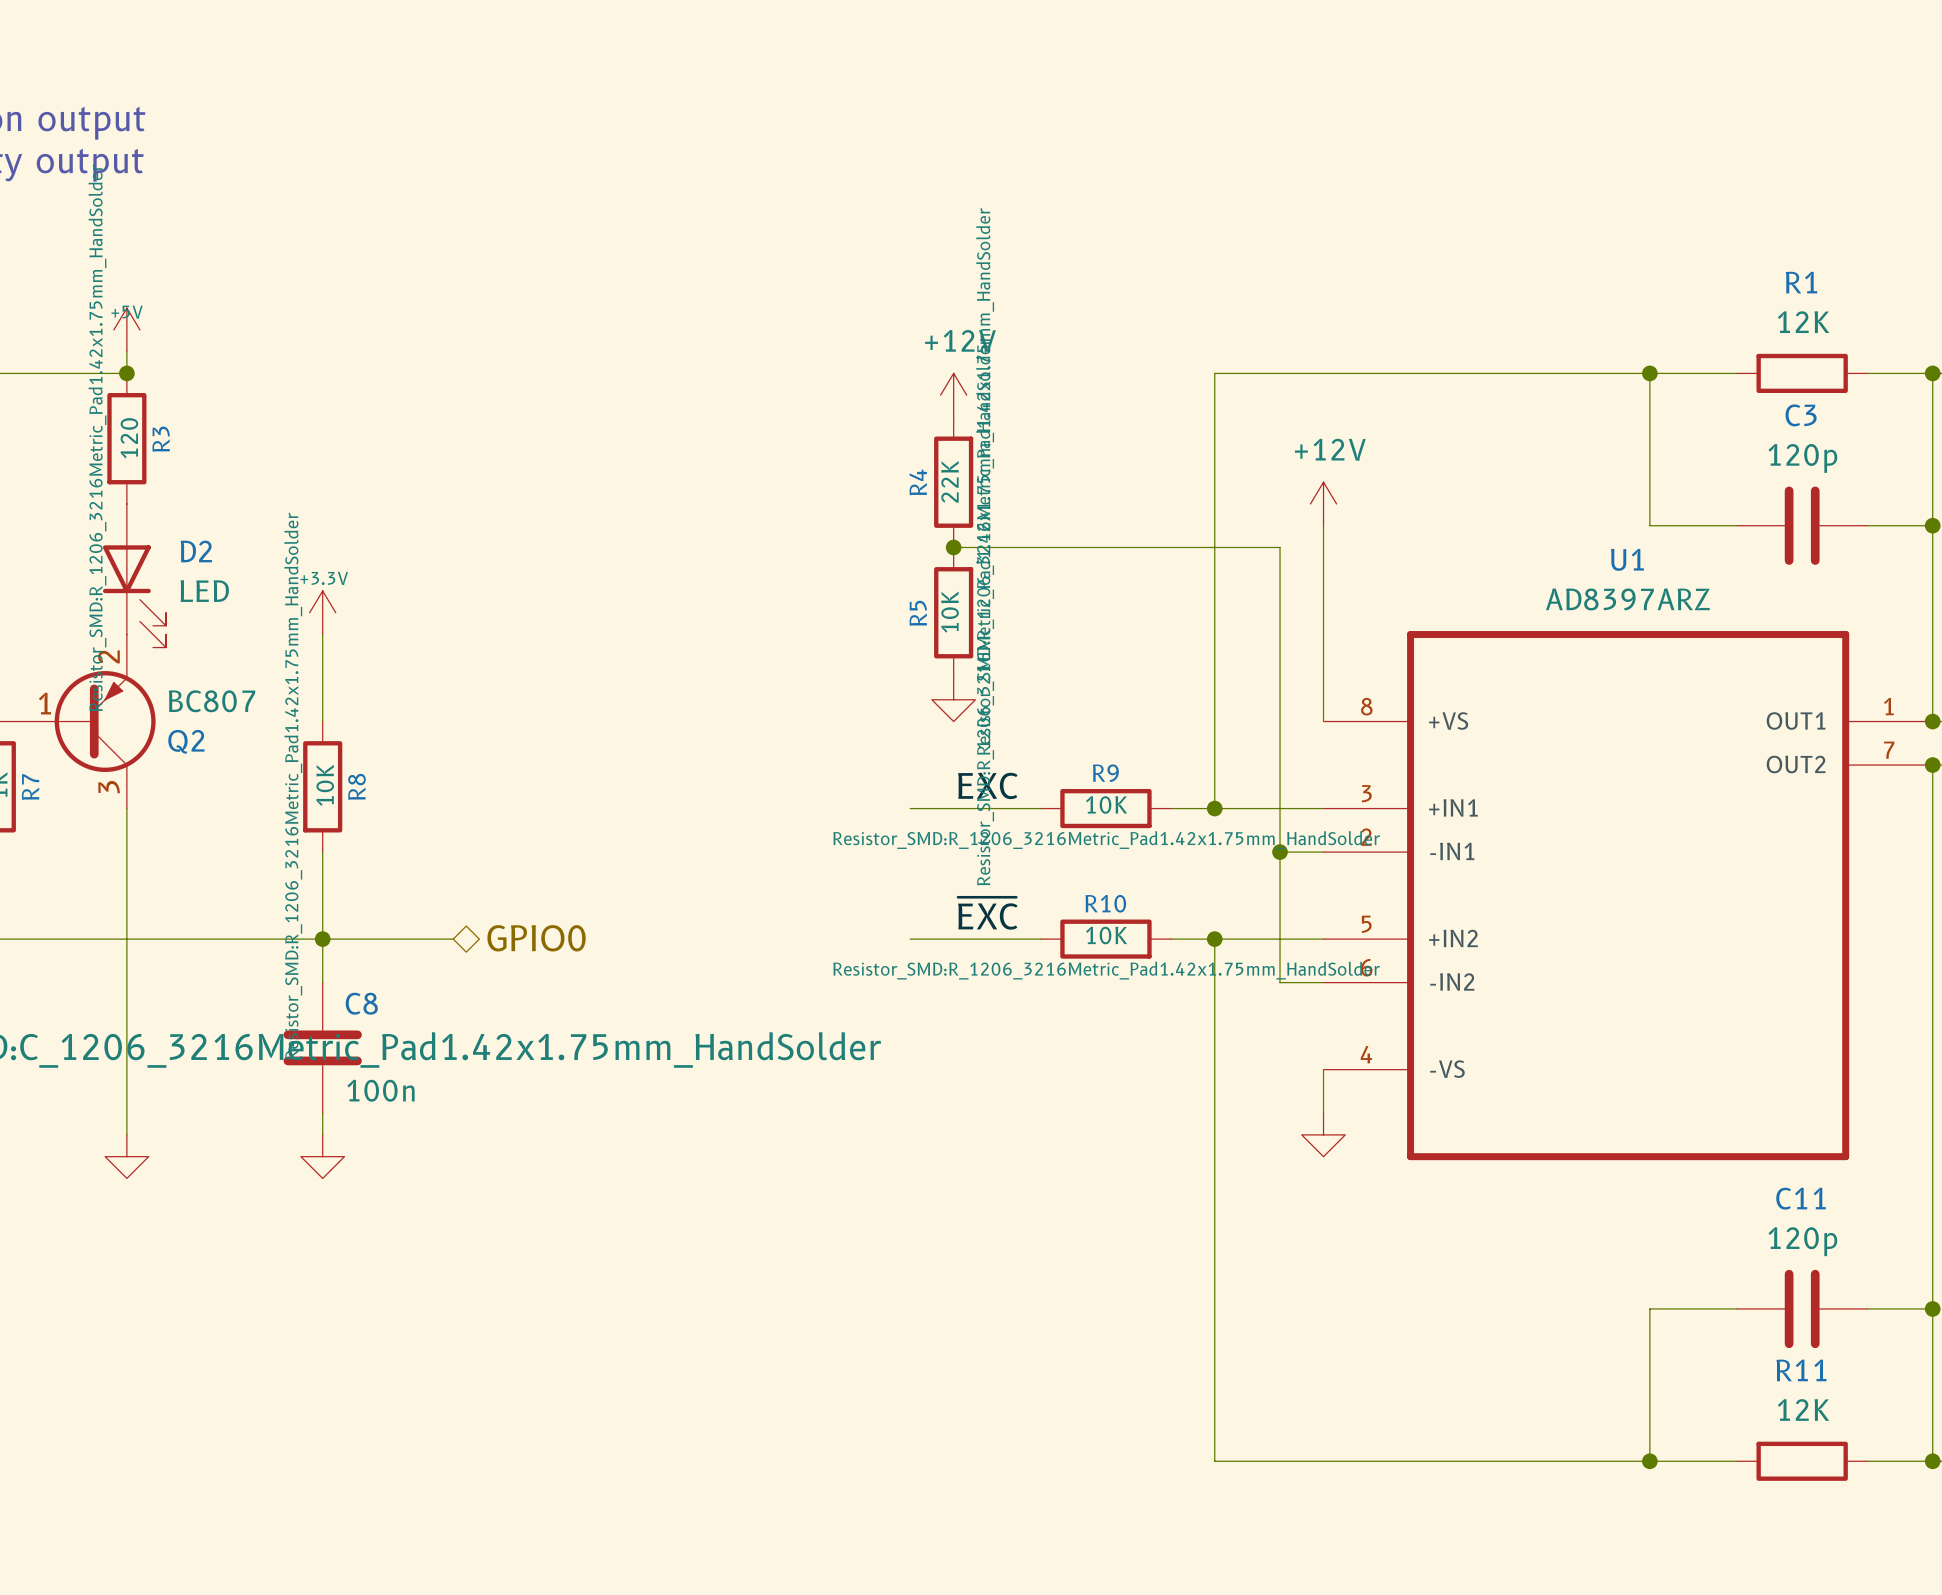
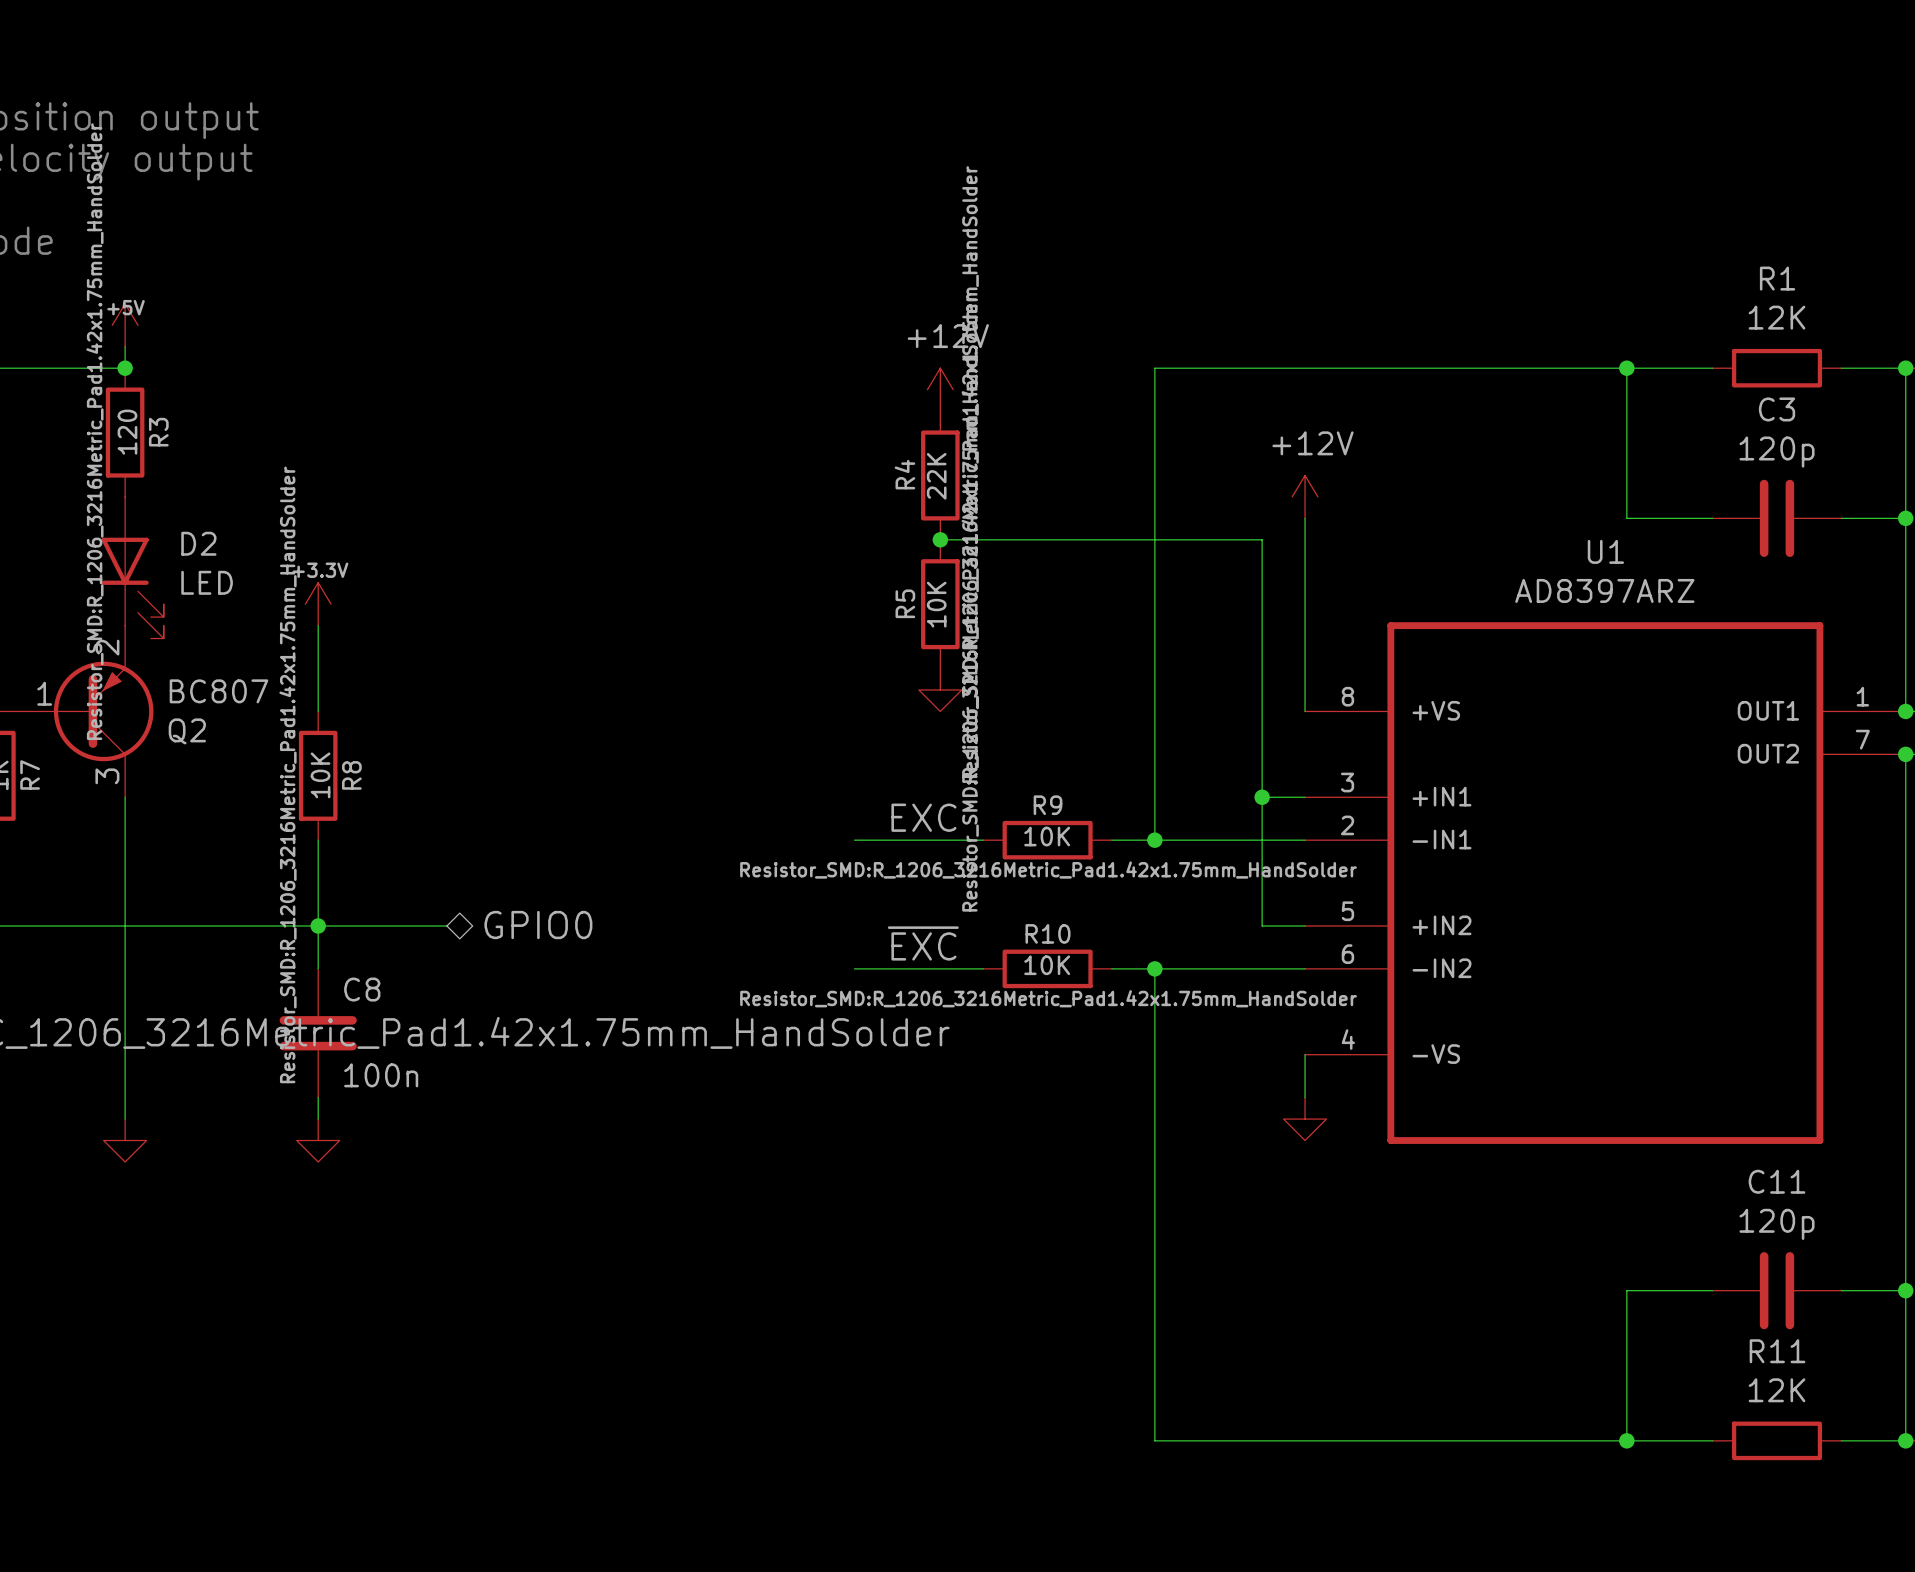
wire: (1214, 373) (1214, 808) -> (1197, 368) (1154, 368) (1154, 840)
label position: EXC (987, 785) -> EXC (923, 817)
wire: (910, 808) (1040, 808) -> (854, 840) (983, 840)
R9 position: (1105, 808) -> (1047, 840)
wire: (1171, 808) (1280, 808) -> none
junction: (1214, 808) -> none
junction: none -> (1262, 797)
wire: none -> (1111, 840) (1262, 840)
junction: none -> (1154, 840)
junction: (1280, 852) -> none
label position: ~{EXC} (987, 913) -> ~{EXC} (923, 943)
wire: (910, 939) (1040, 939) -> (854, 968) (983, 968)
R10 position: (1105, 939) -> (1047, 968)
wire: (1171, 939) (1280, 939) (1280, 982) -> (1111, 968) (1262, 968)
wire: (1214, 939) (1214, 1461) -> (1154, 968) (1154, 1440) (1197, 1440)
junction: (1214, 939) -> none
junction: none -> (1154, 968)

